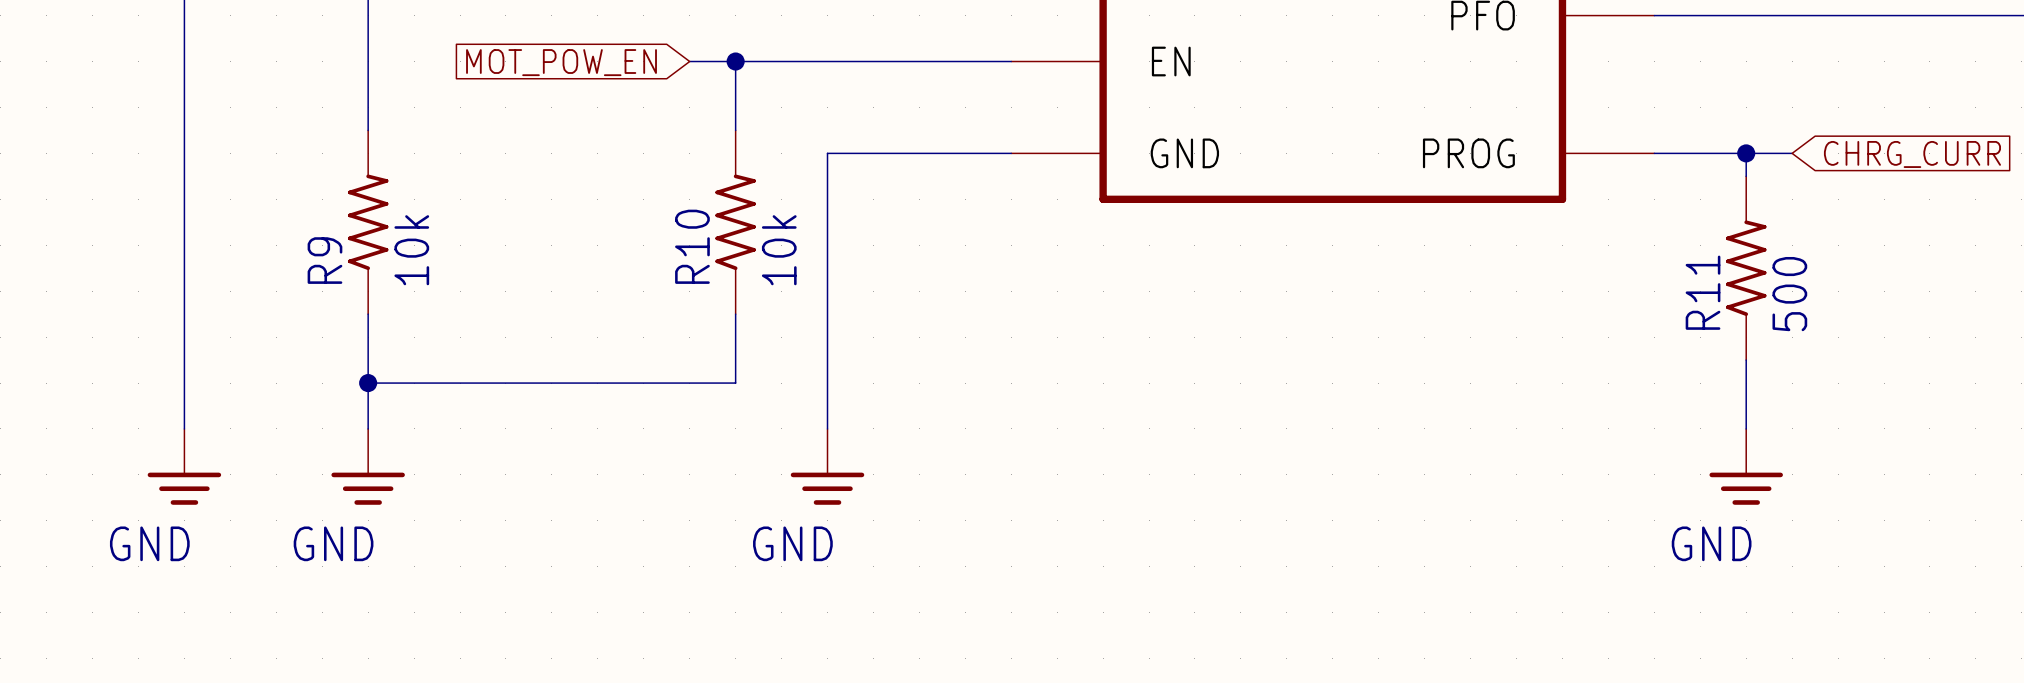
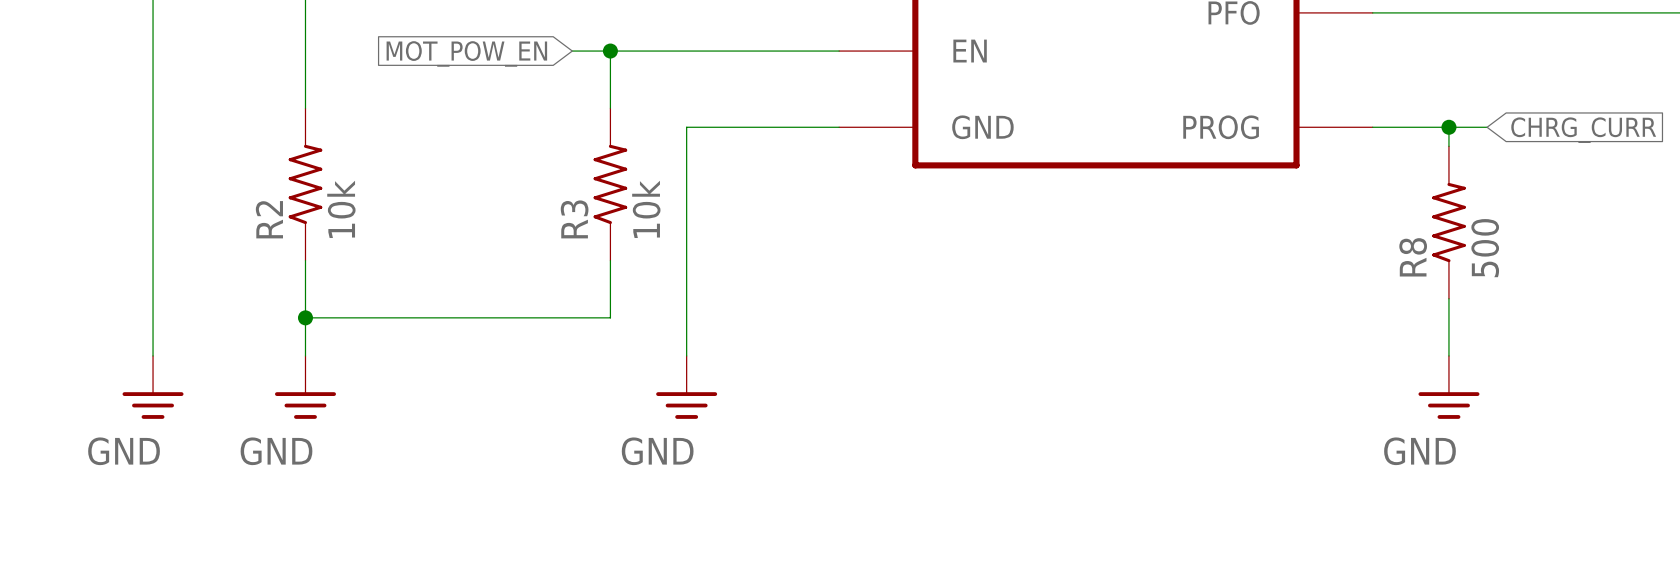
R10 name: R10 (692, 246) -> R3 (574, 219)
R9 name: R9 (324, 260) -> R2 (269, 219)
R11 name: R11 (1703, 292) -> R8 (1413, 257)

